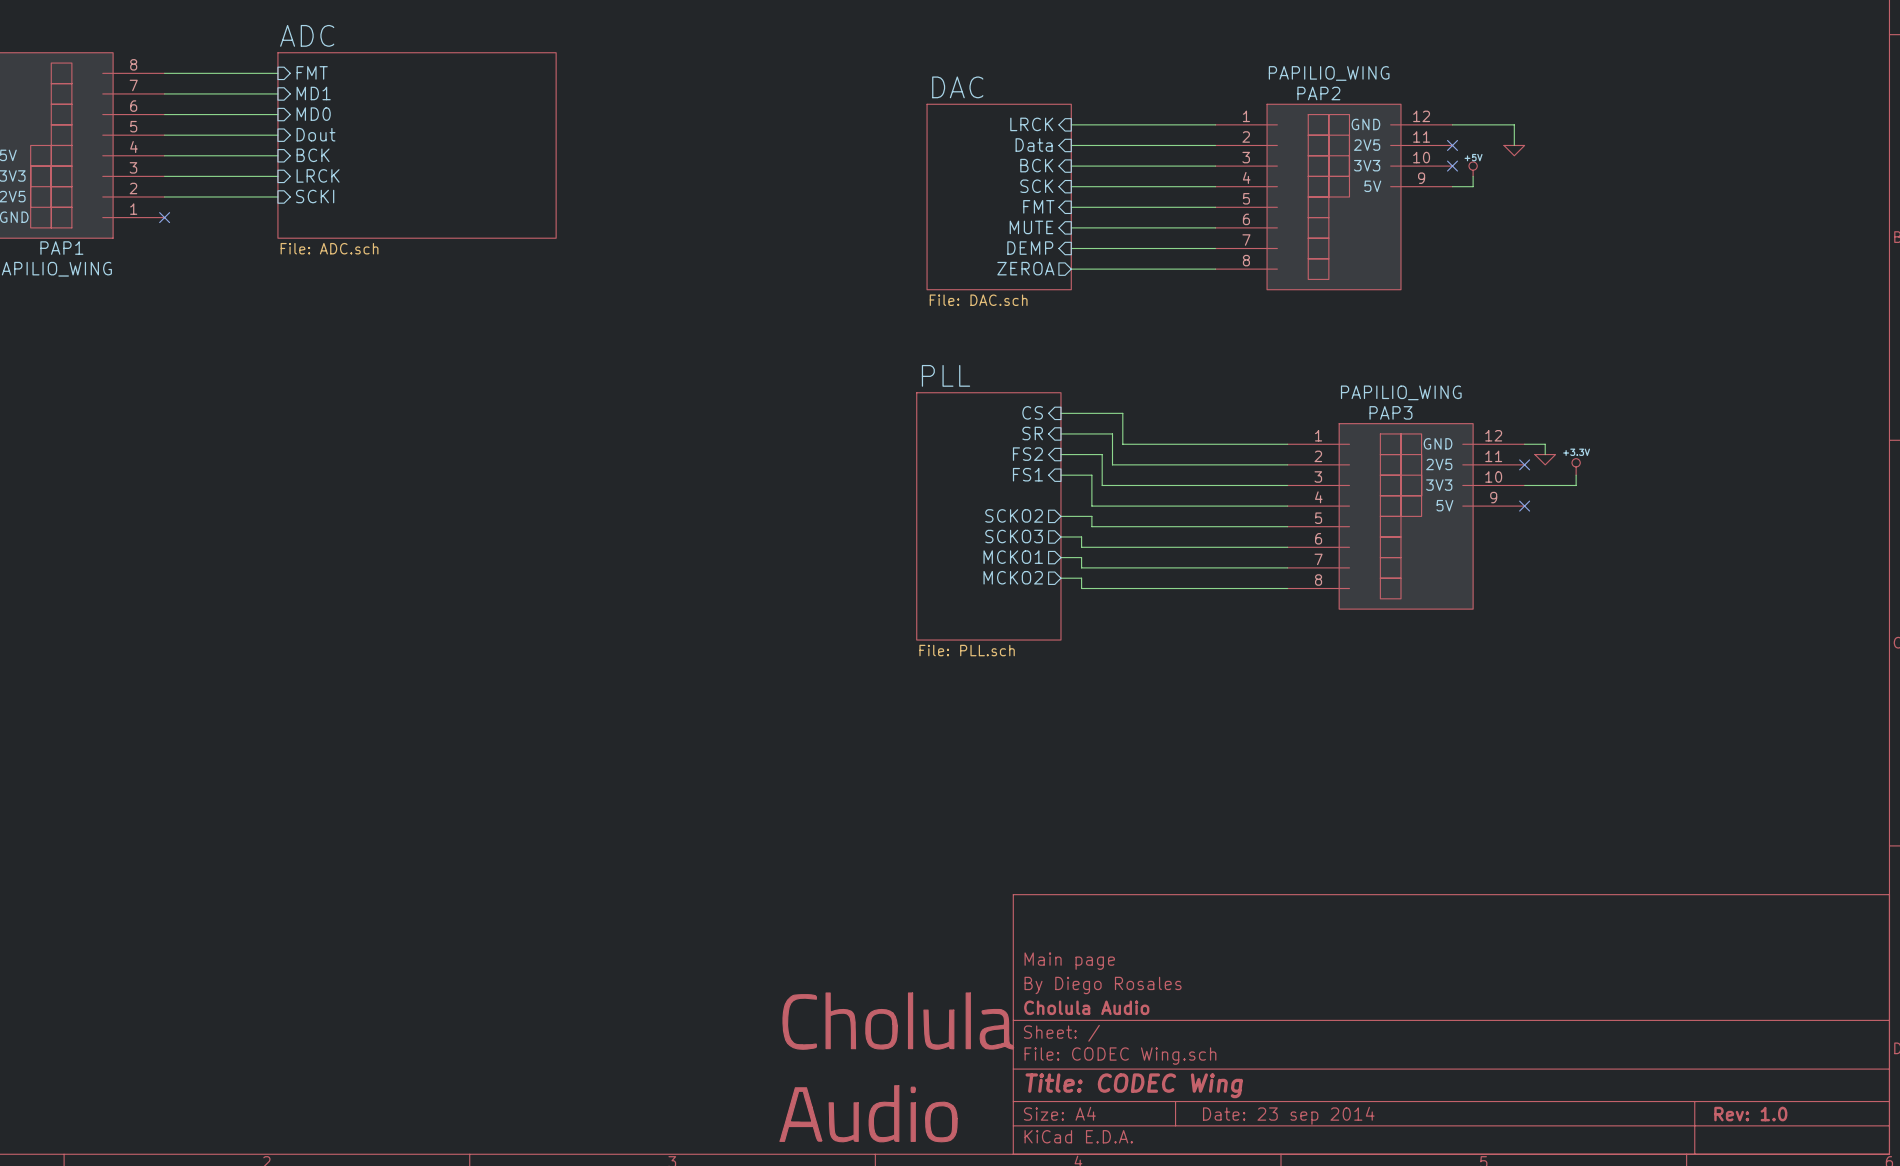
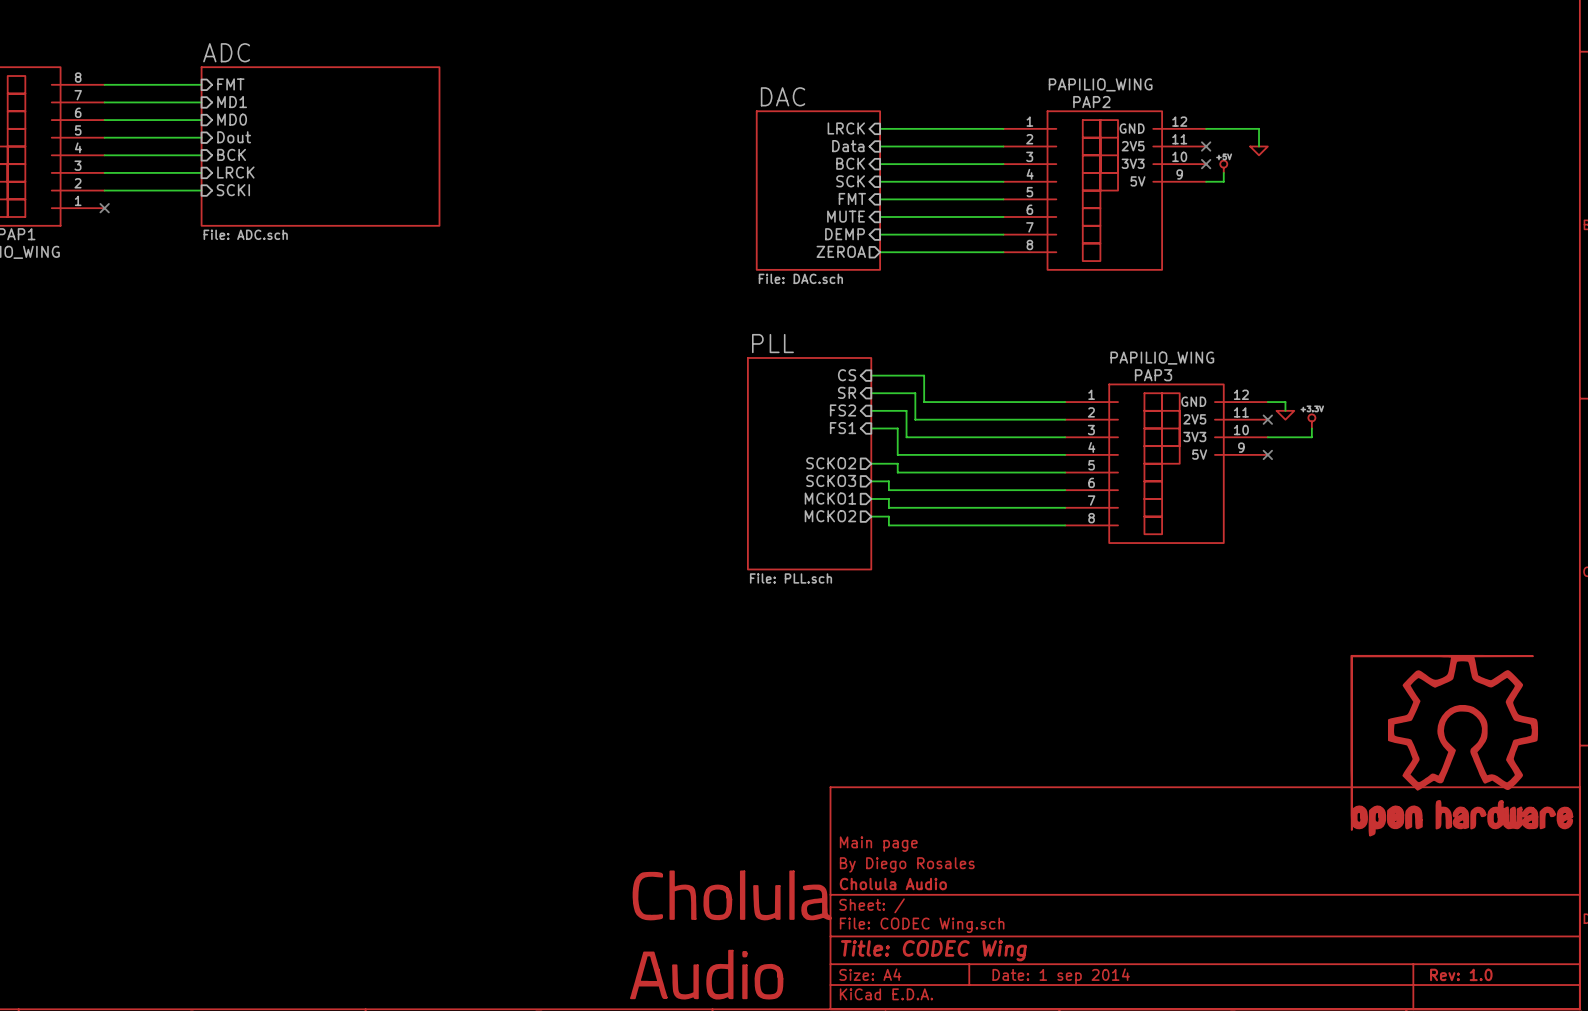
power symbol: none -> (1461, 745)
title block: Date: 23 sep 2014 (1288, 1115) -> Date: 1 sep 2014 (1061, 976)

